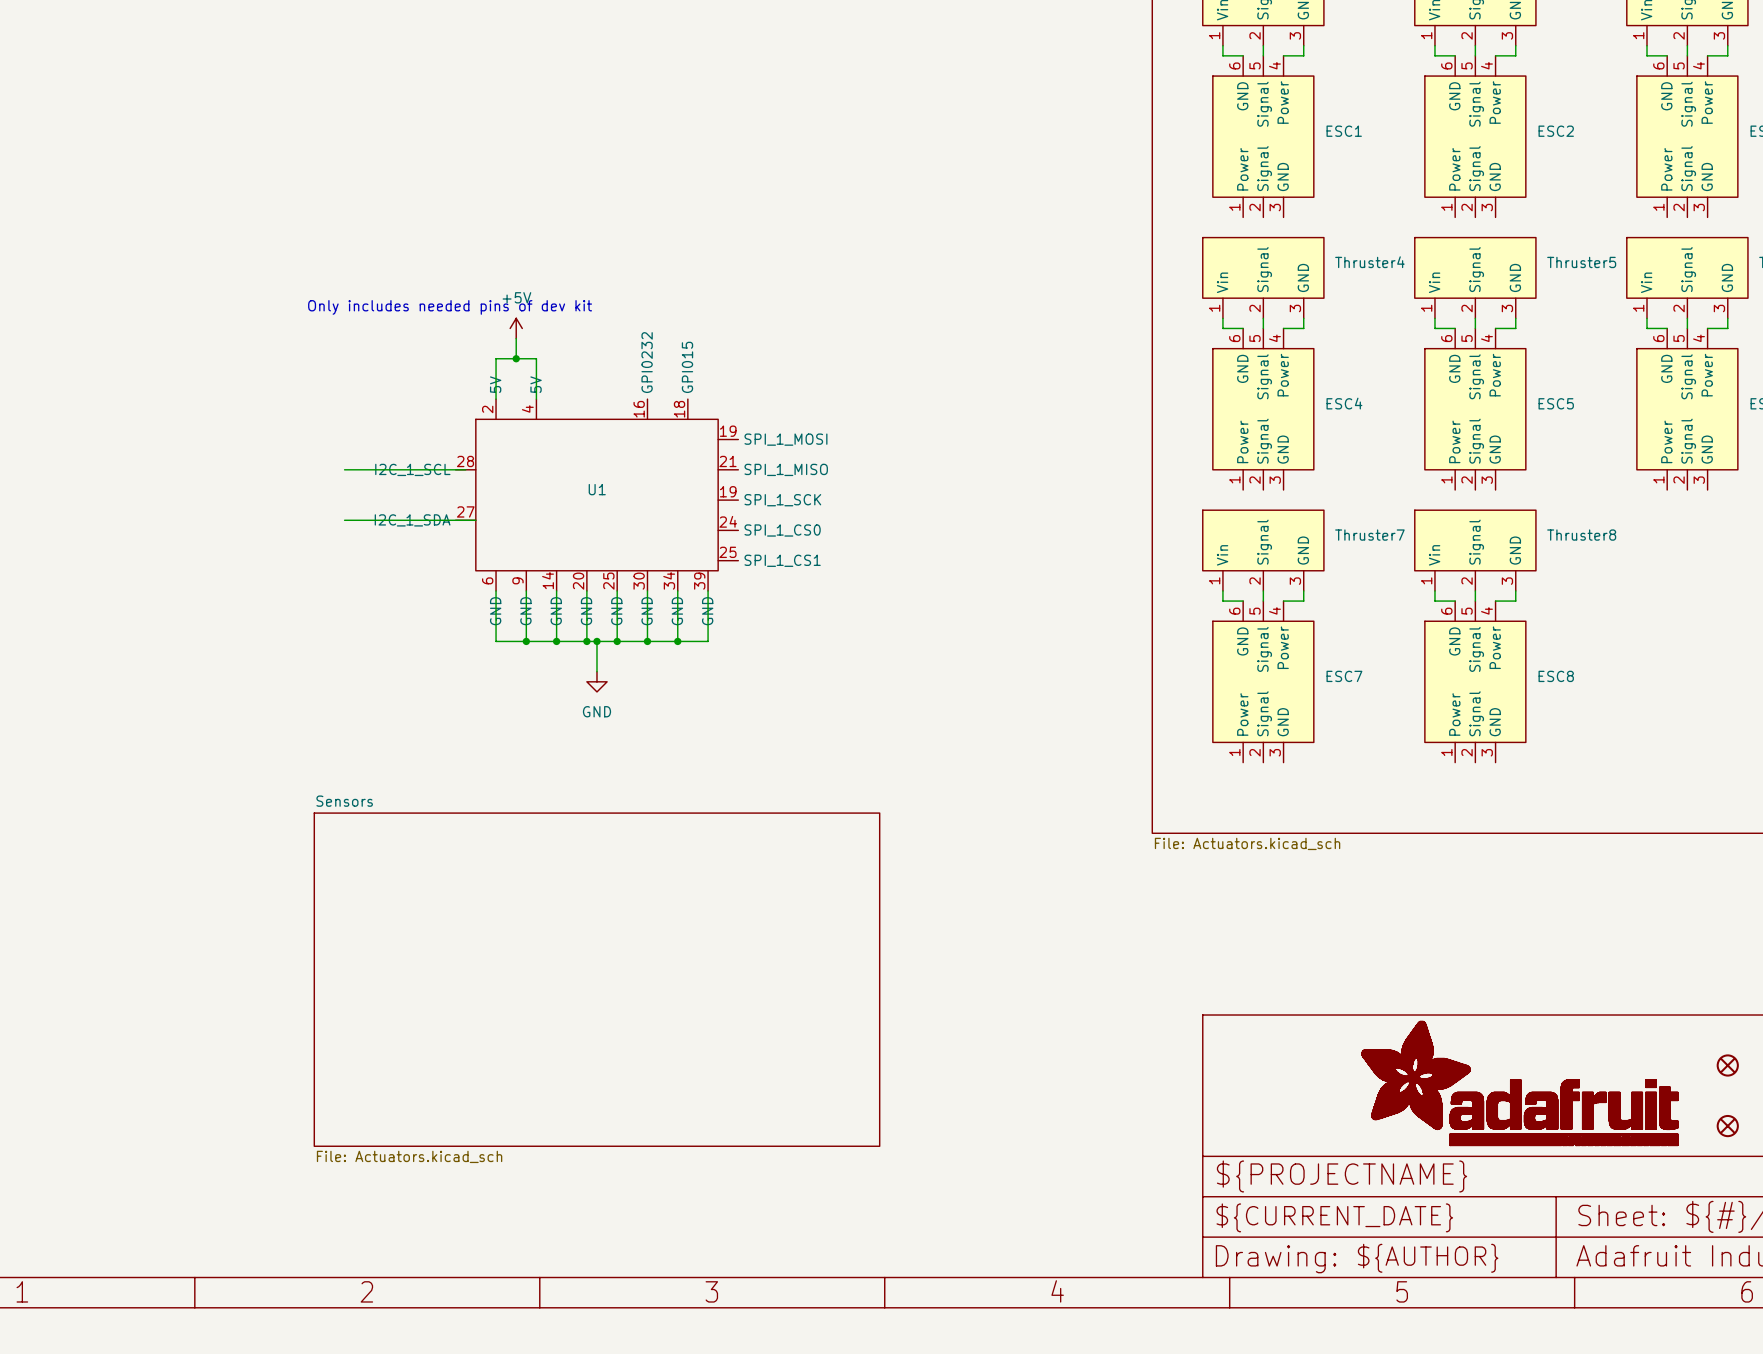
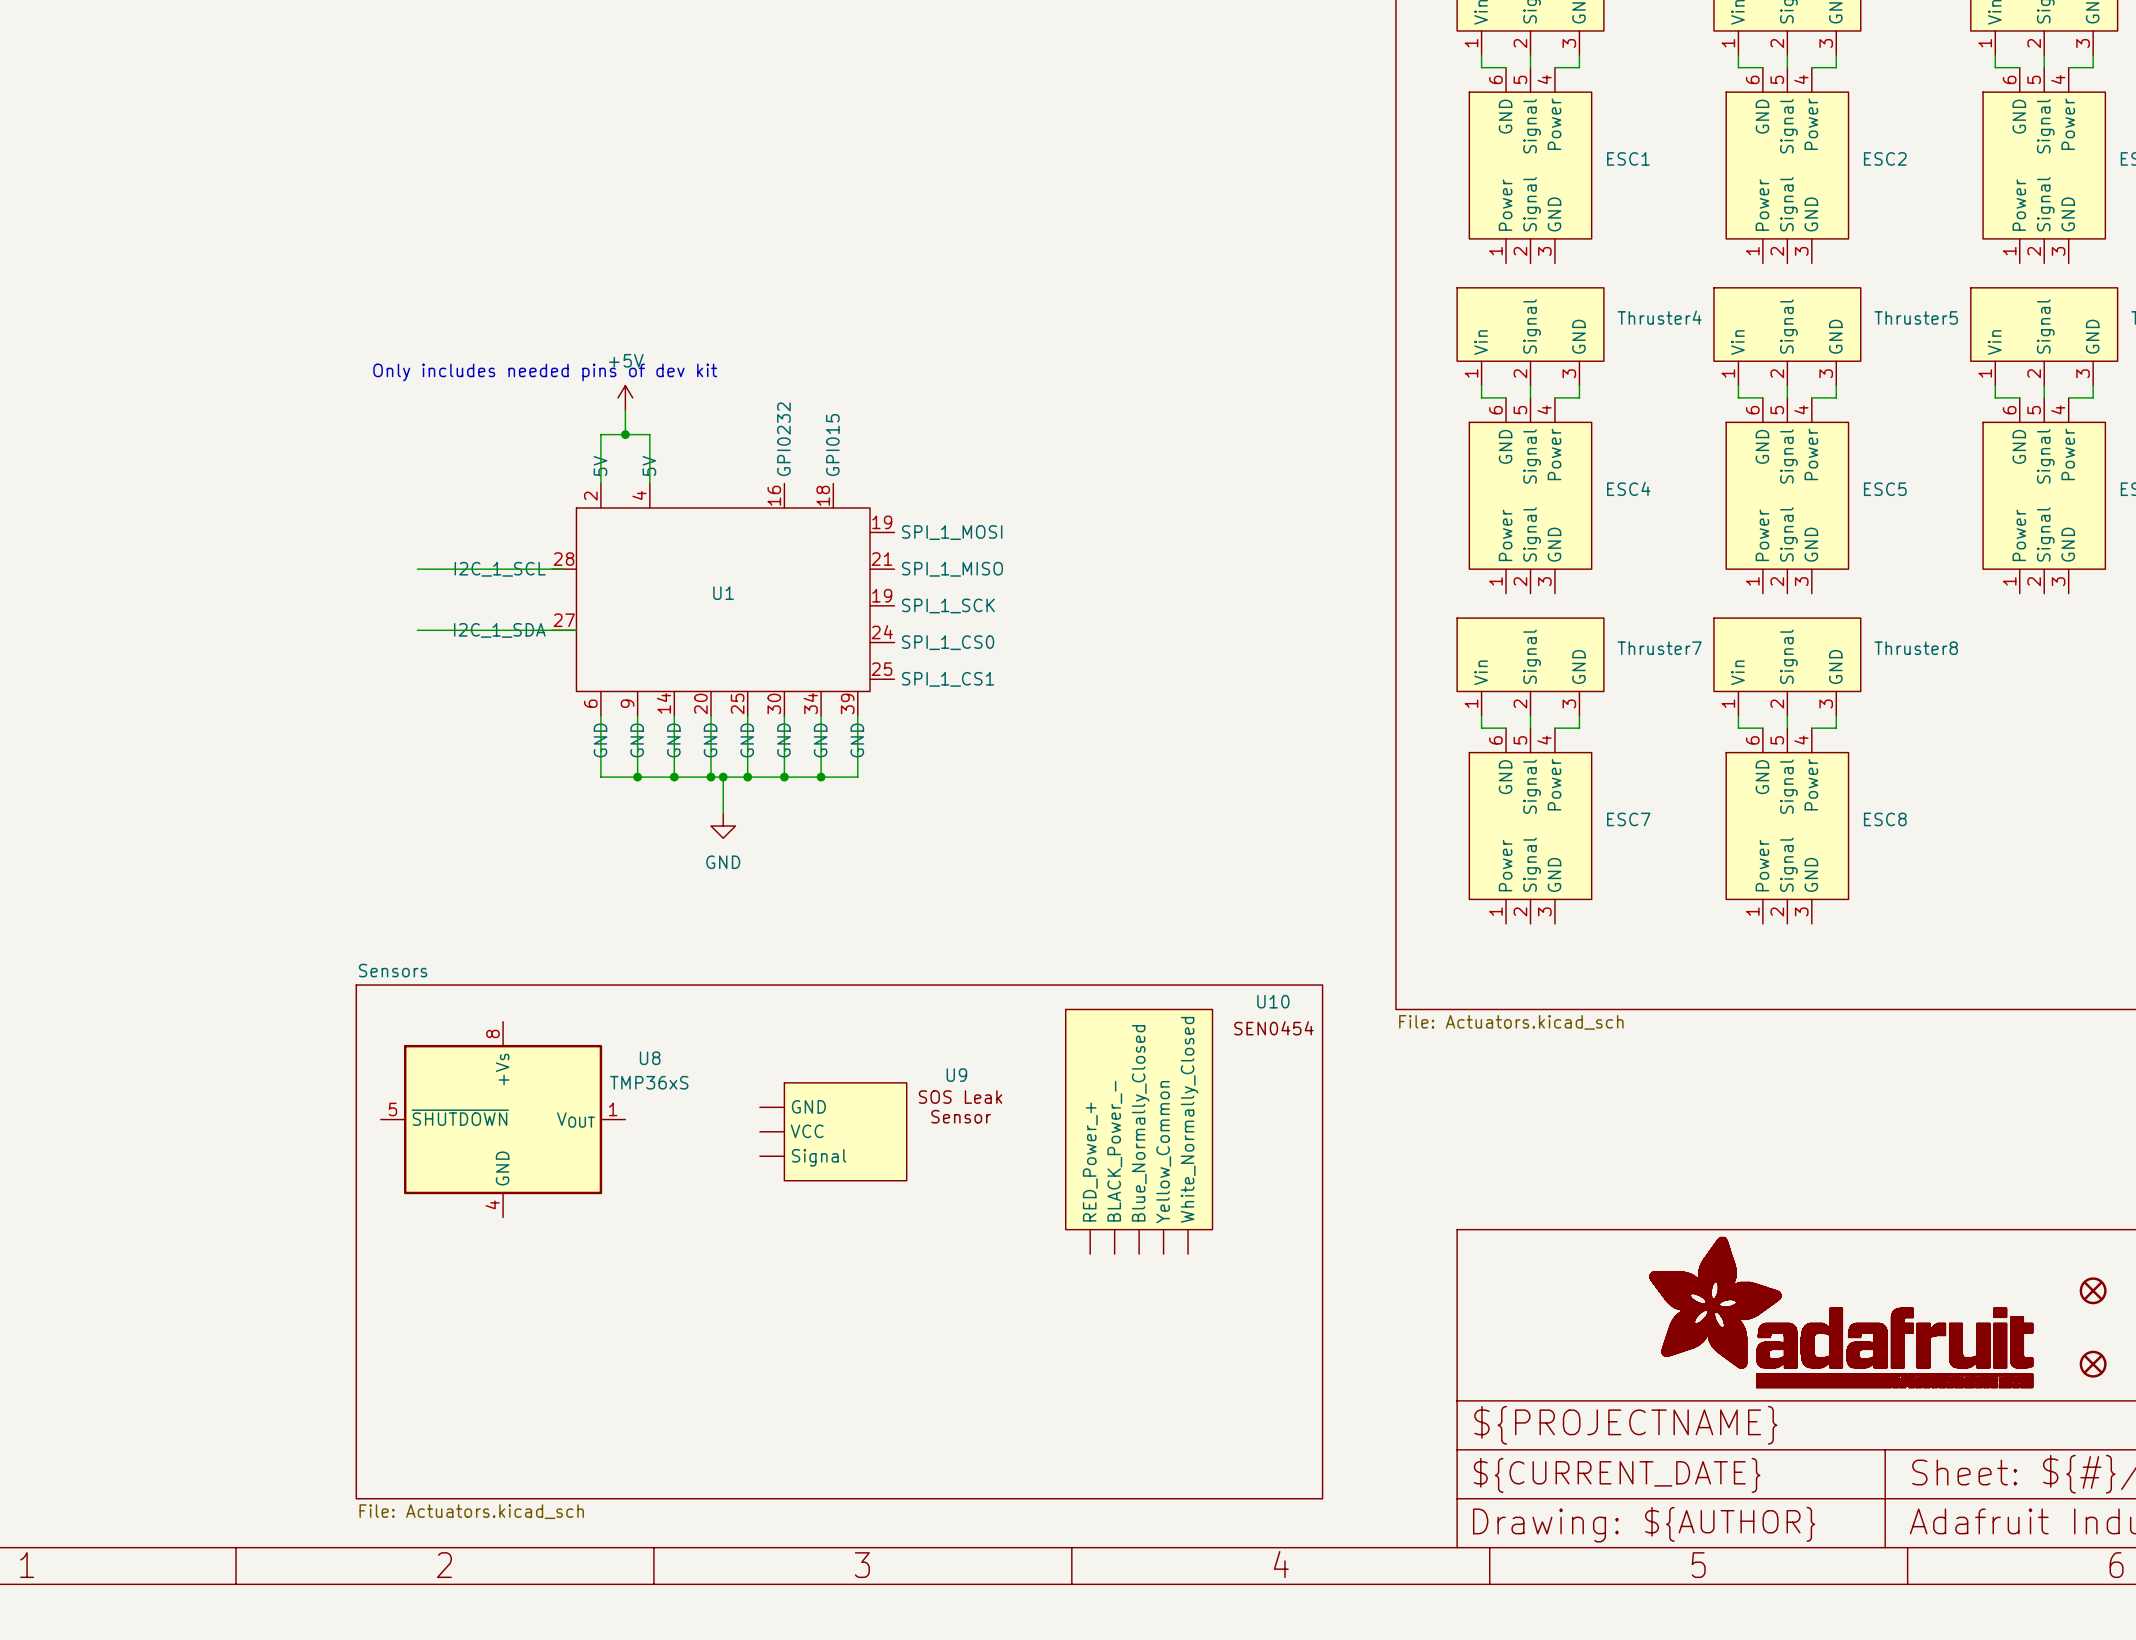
U8: none -> TMP36xS (503, 1119)
U9: none -> (833, 1131)
U10: none -> (1139, 1131)
sheet Sensors: File: Actuators.kicad_sch (596, 979) -> none
sheet Sensors: none -> File: Actuators.kicad_sch (839, 1241)

